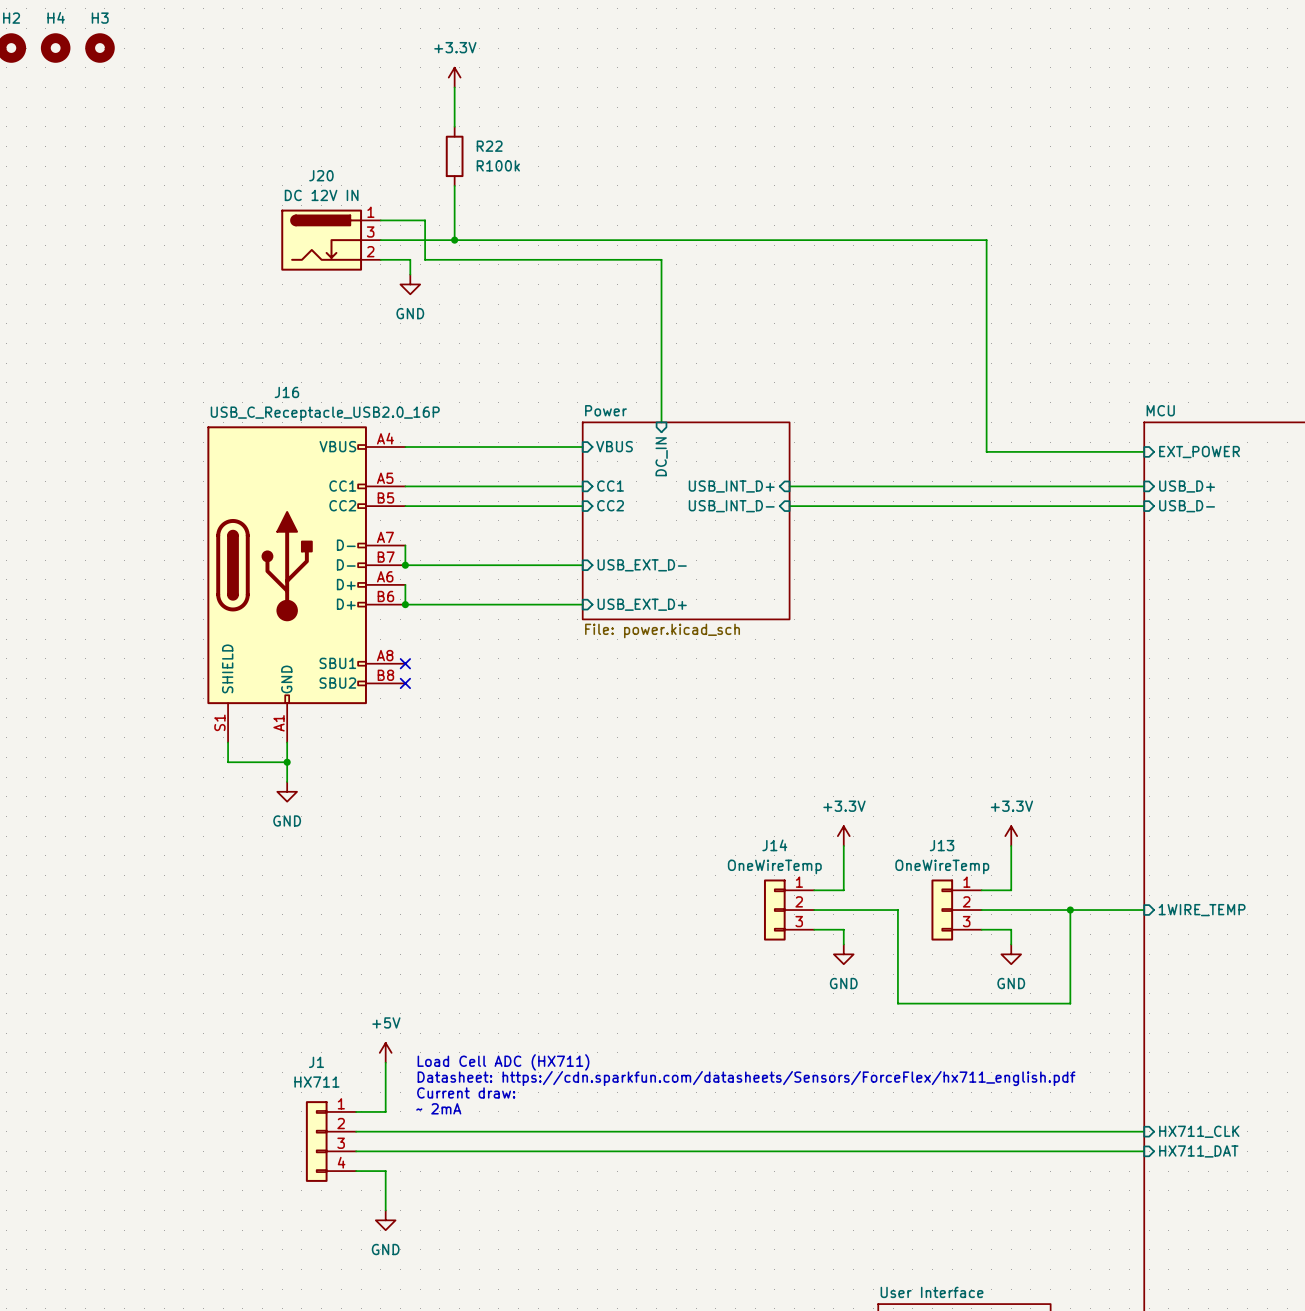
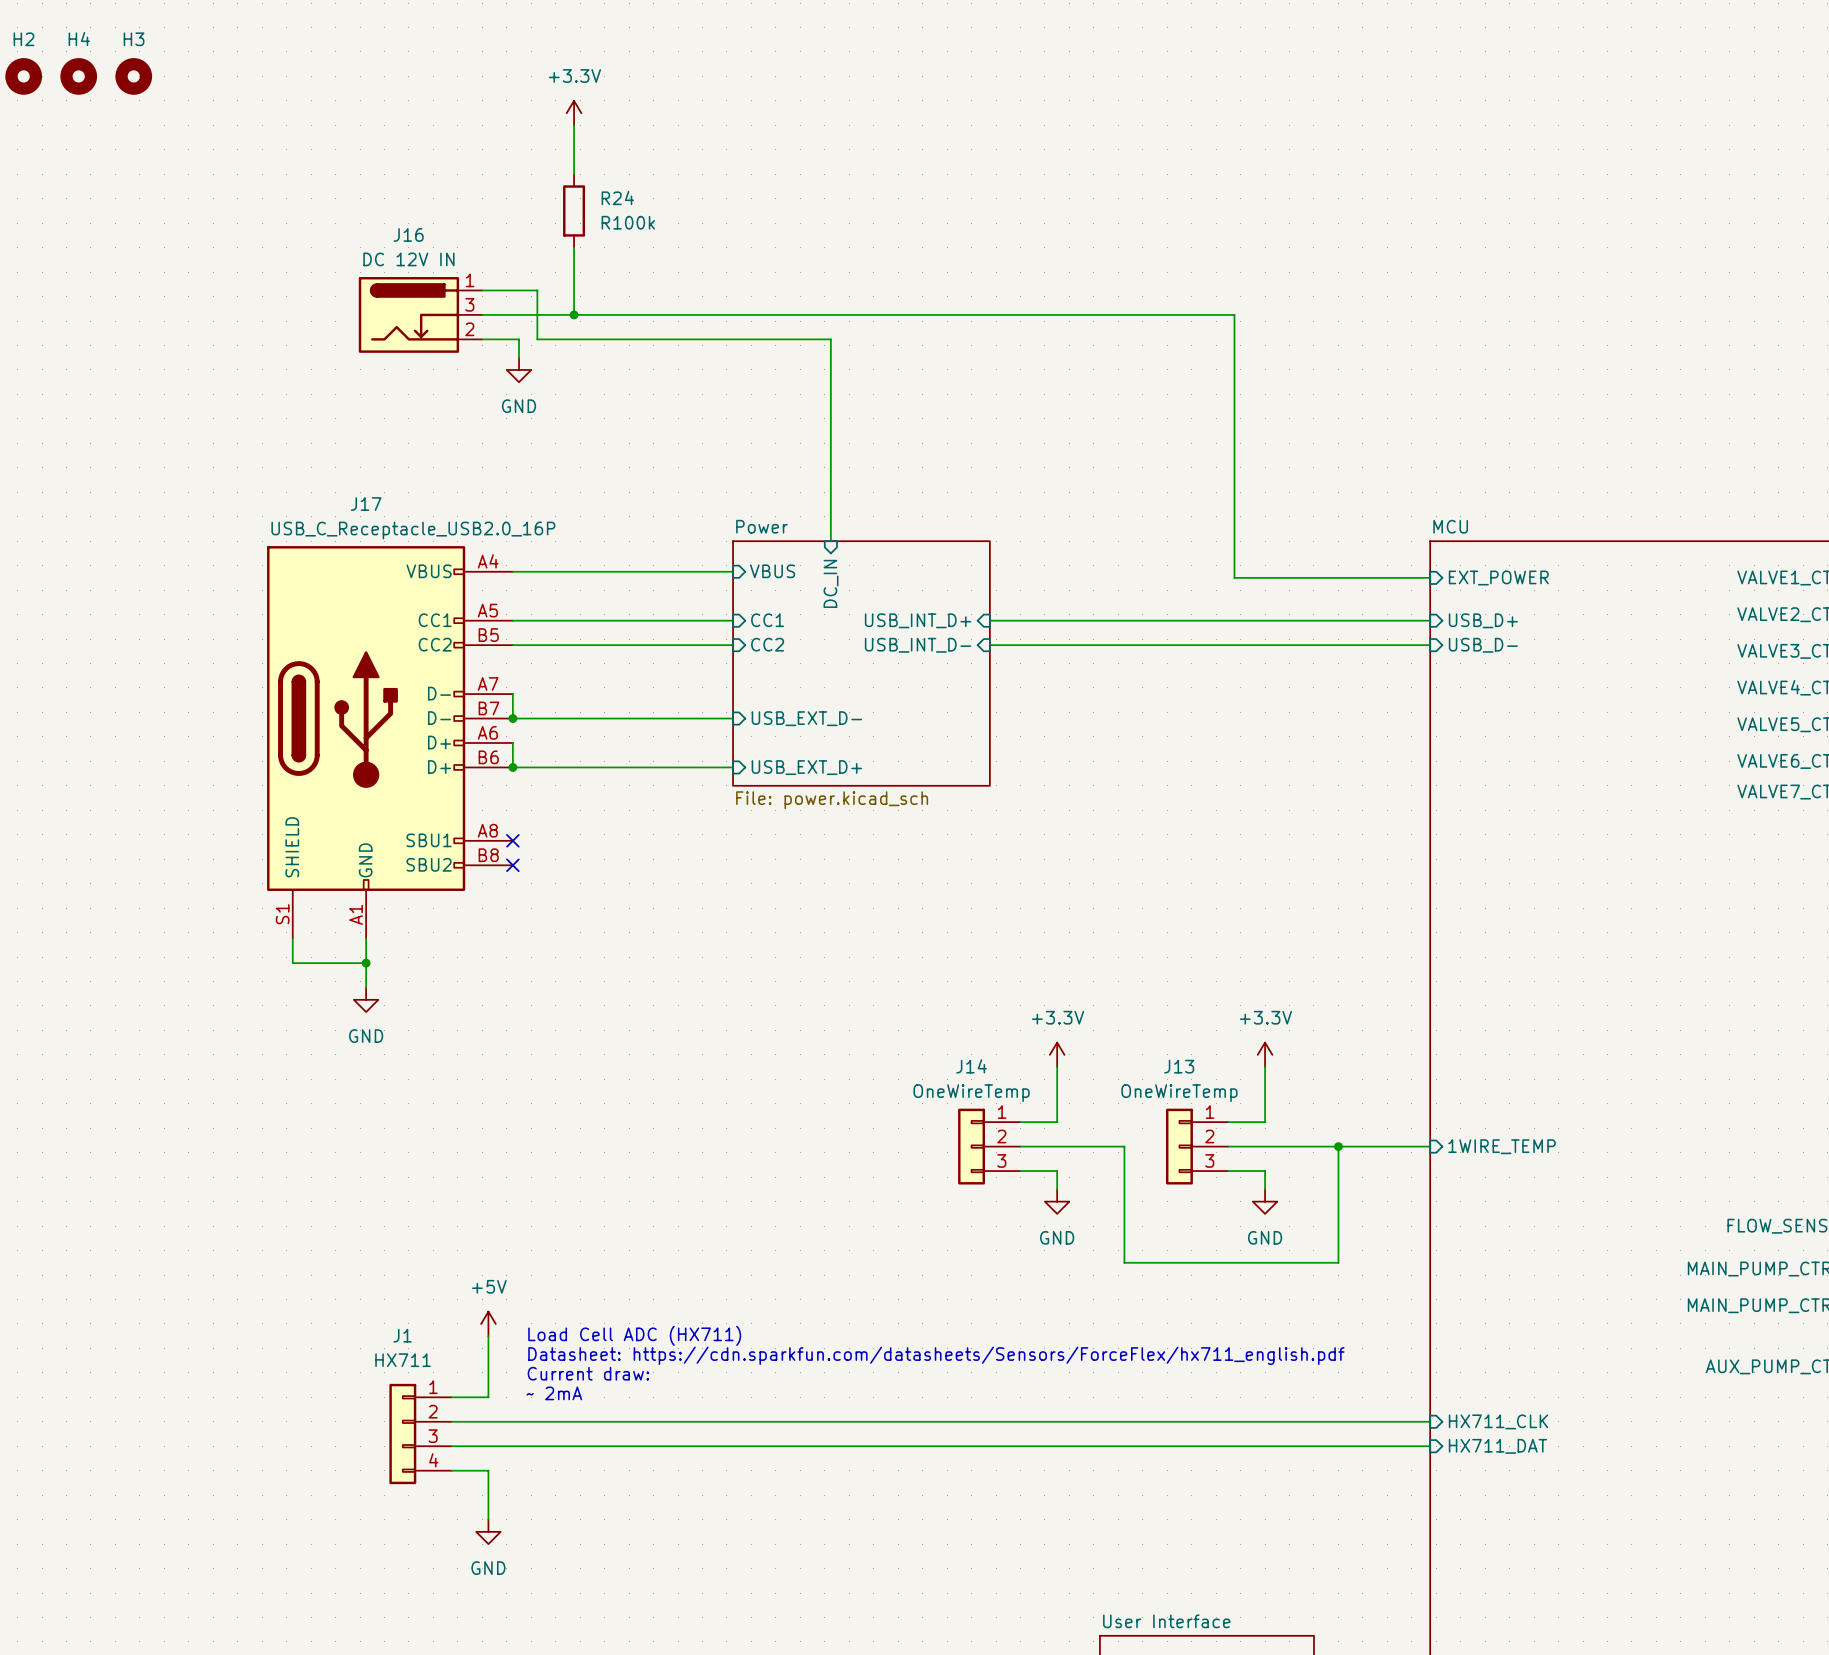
R22 name: R22 (489, 146) -> R24 (617, 197)
J20 name: J20 (321, 175) -> J16 (408, 234)
J16 name: J16 (286, 392) -> J17 (366, 504)

